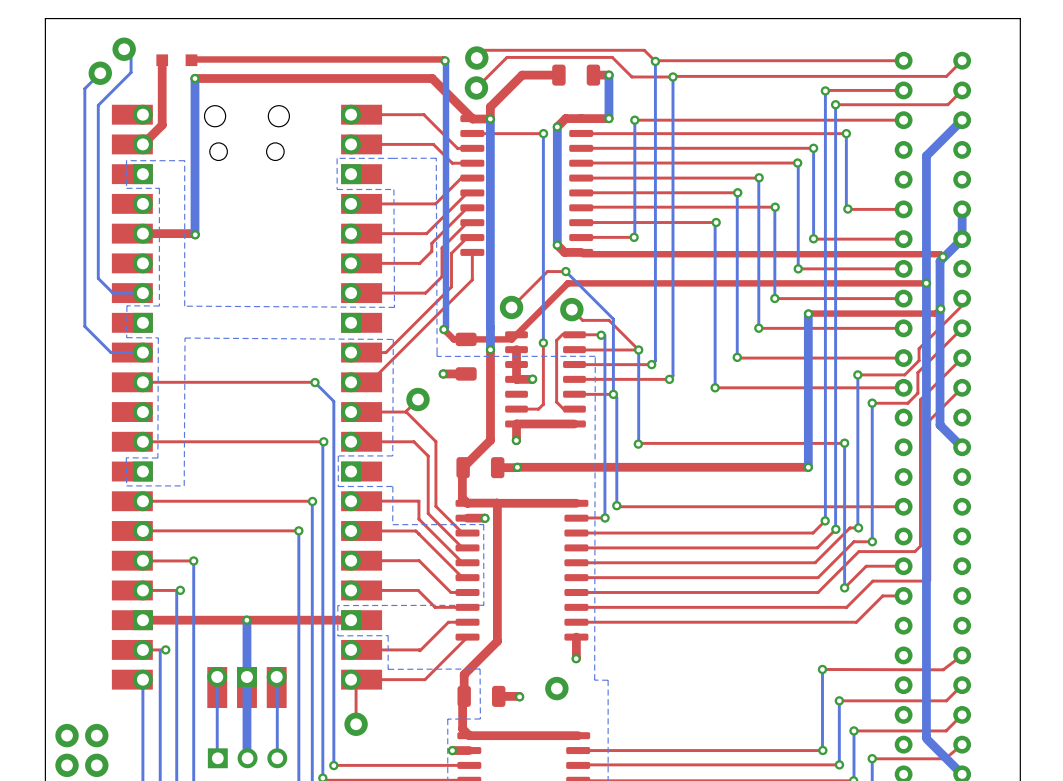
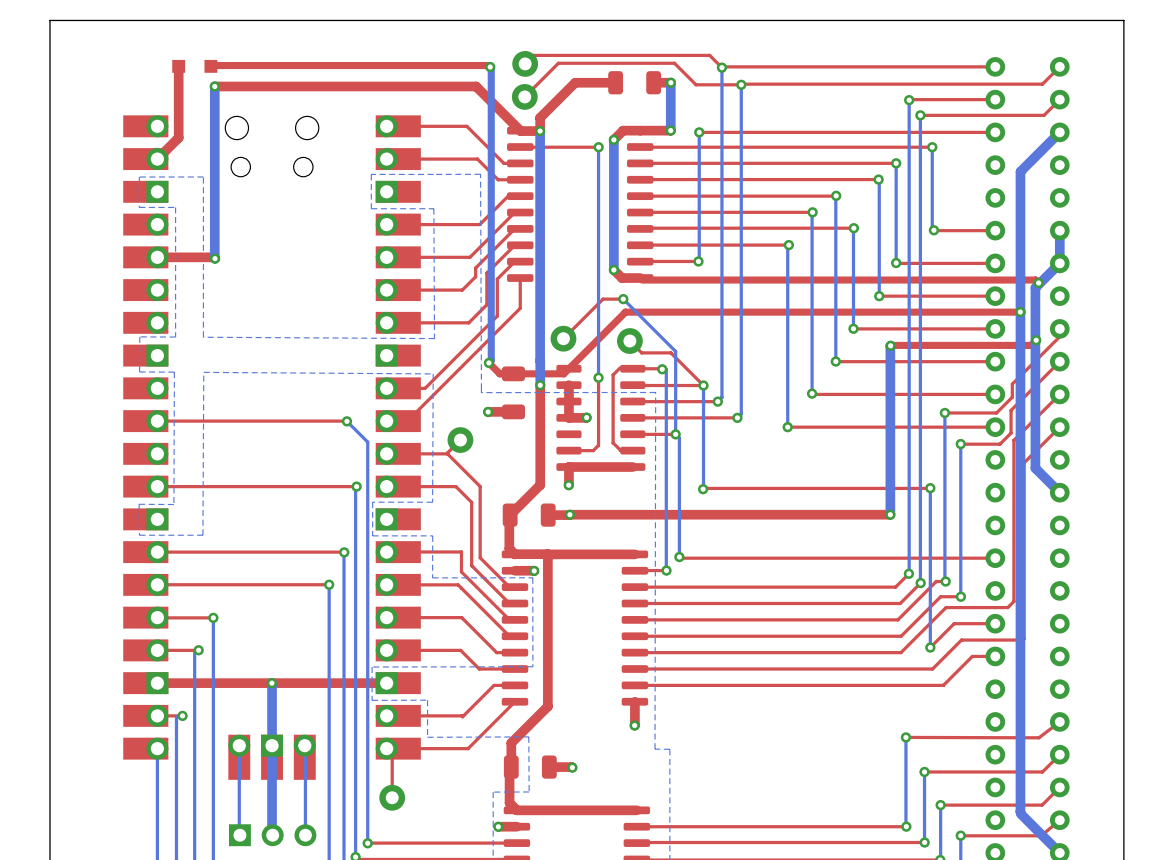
bottom track: (124, 49) (131, 56) (131, 72) (98, 105) (98, 278) (112, 293) (142, 293) -> none
part: (124, 49) -> none
bottom track: (100, 73) (84, 88) (84, 326) (110, 352) (142, 352) -> none
part: (100, 73) -> none
part: (556, 688) -> none
part: (67, 735) -> none
part: (96, 735) -> none
part: (67, 765) -> none
part: (96, 765) -> none

